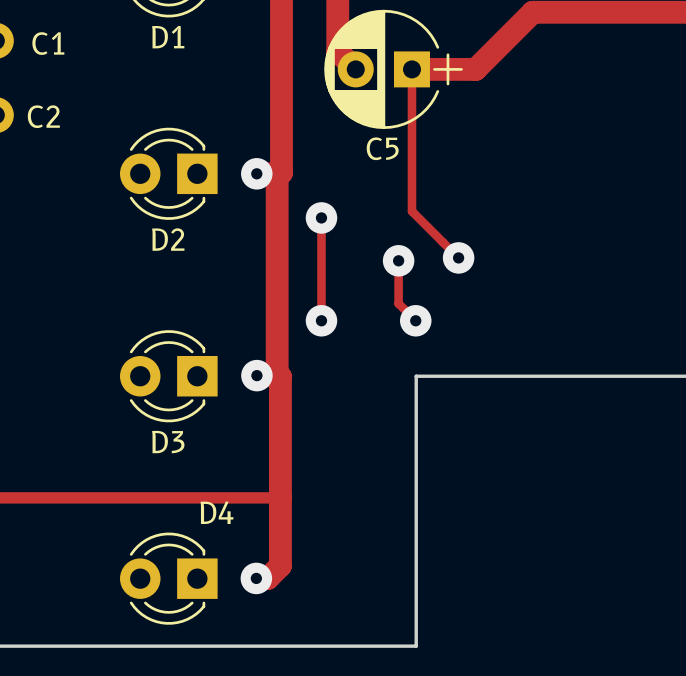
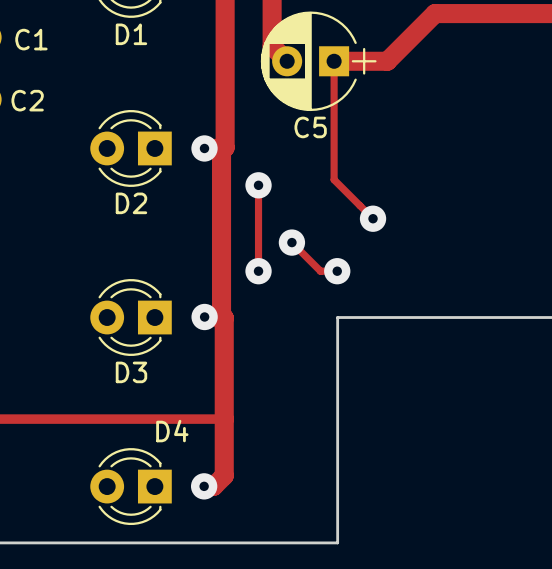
track: (398, 260) (398, 303) (415, 320) -> none
via position: (398, 260) -> (291, 242)
track: none -> (291, 242) (320, 271) (339, 271)

